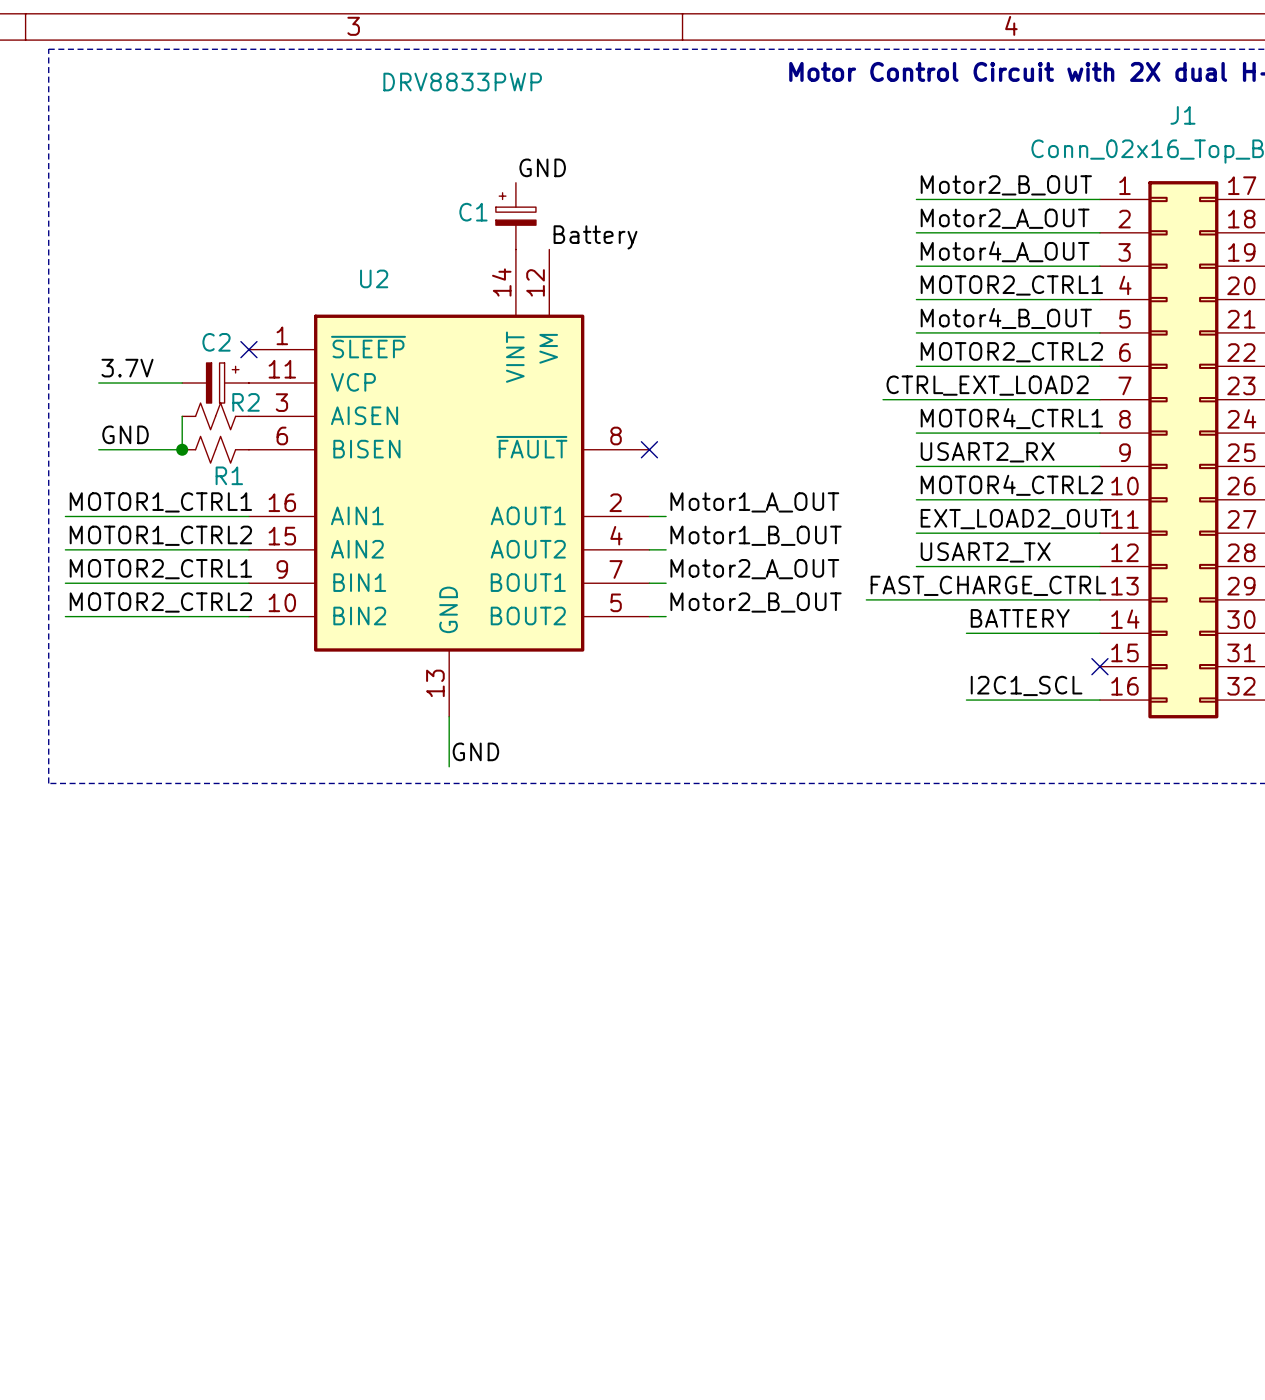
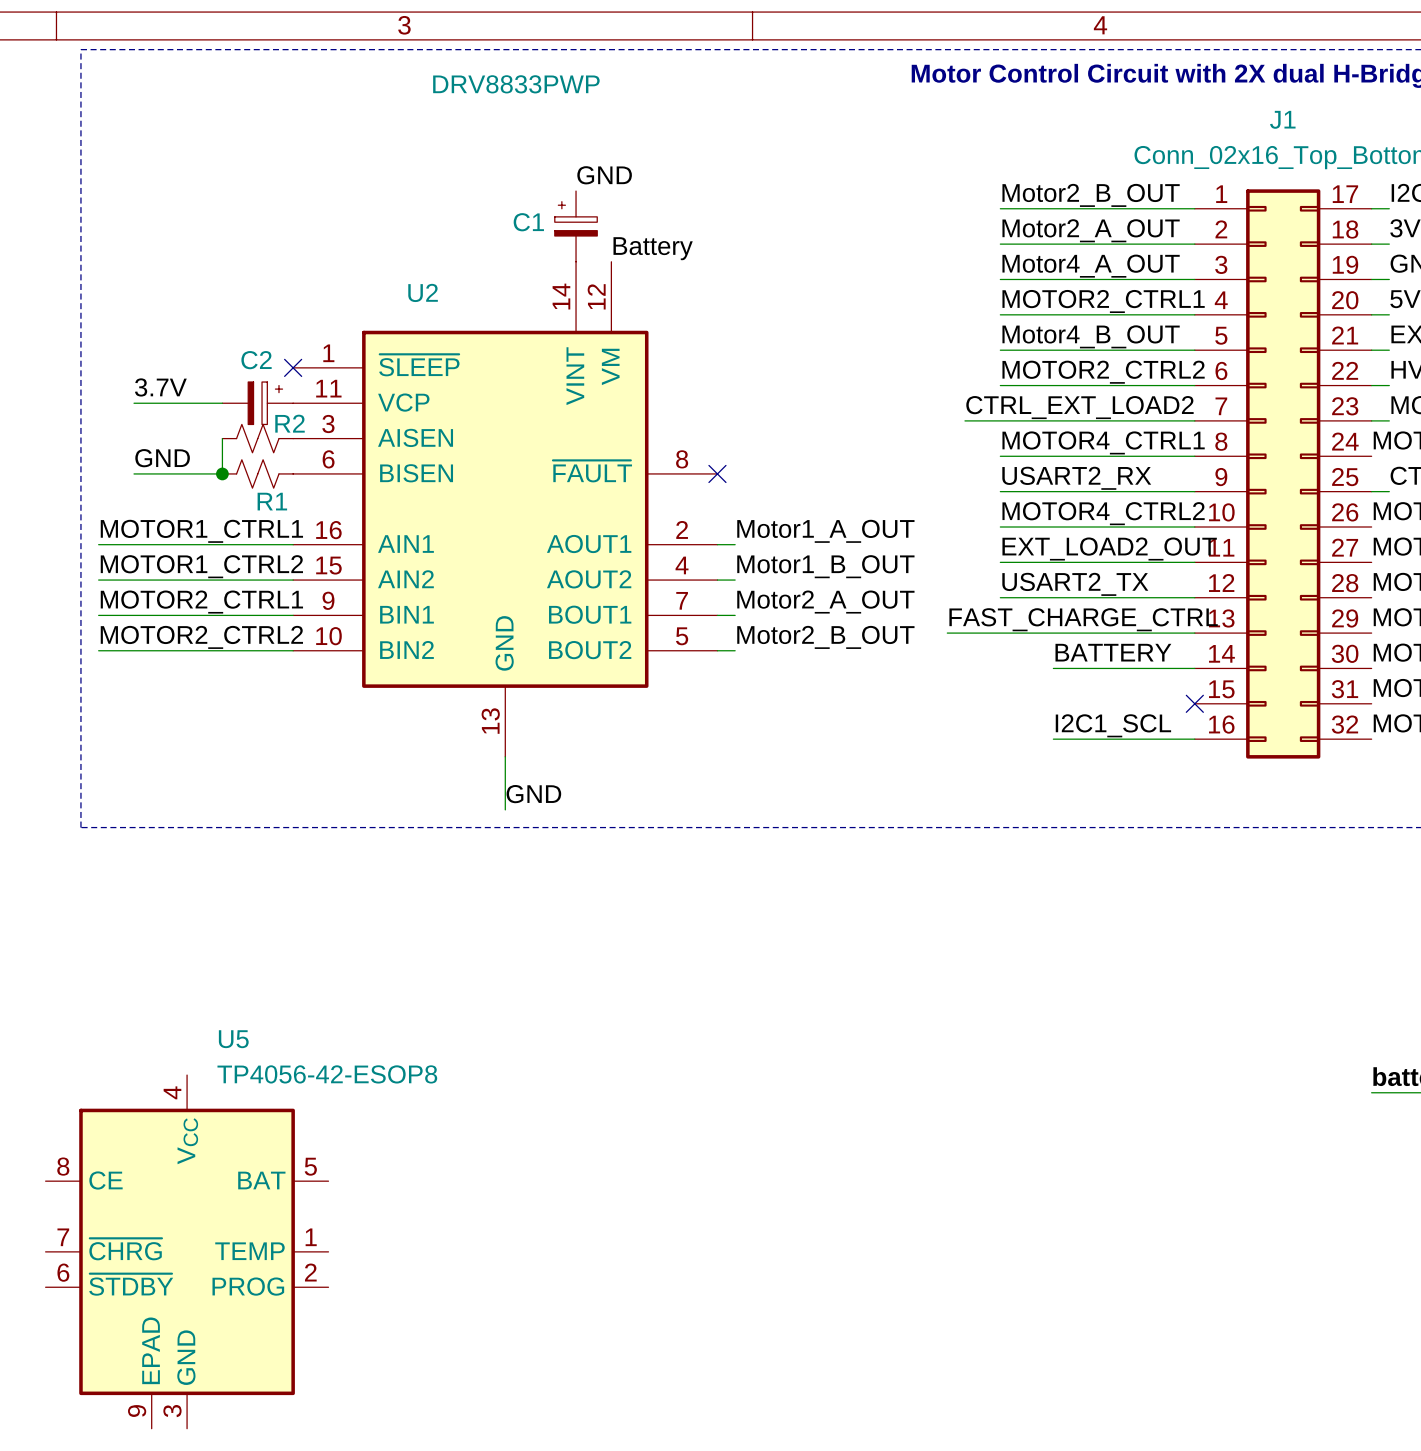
U5: none -> TP4056-42-ESOP8 (187, 1251)

